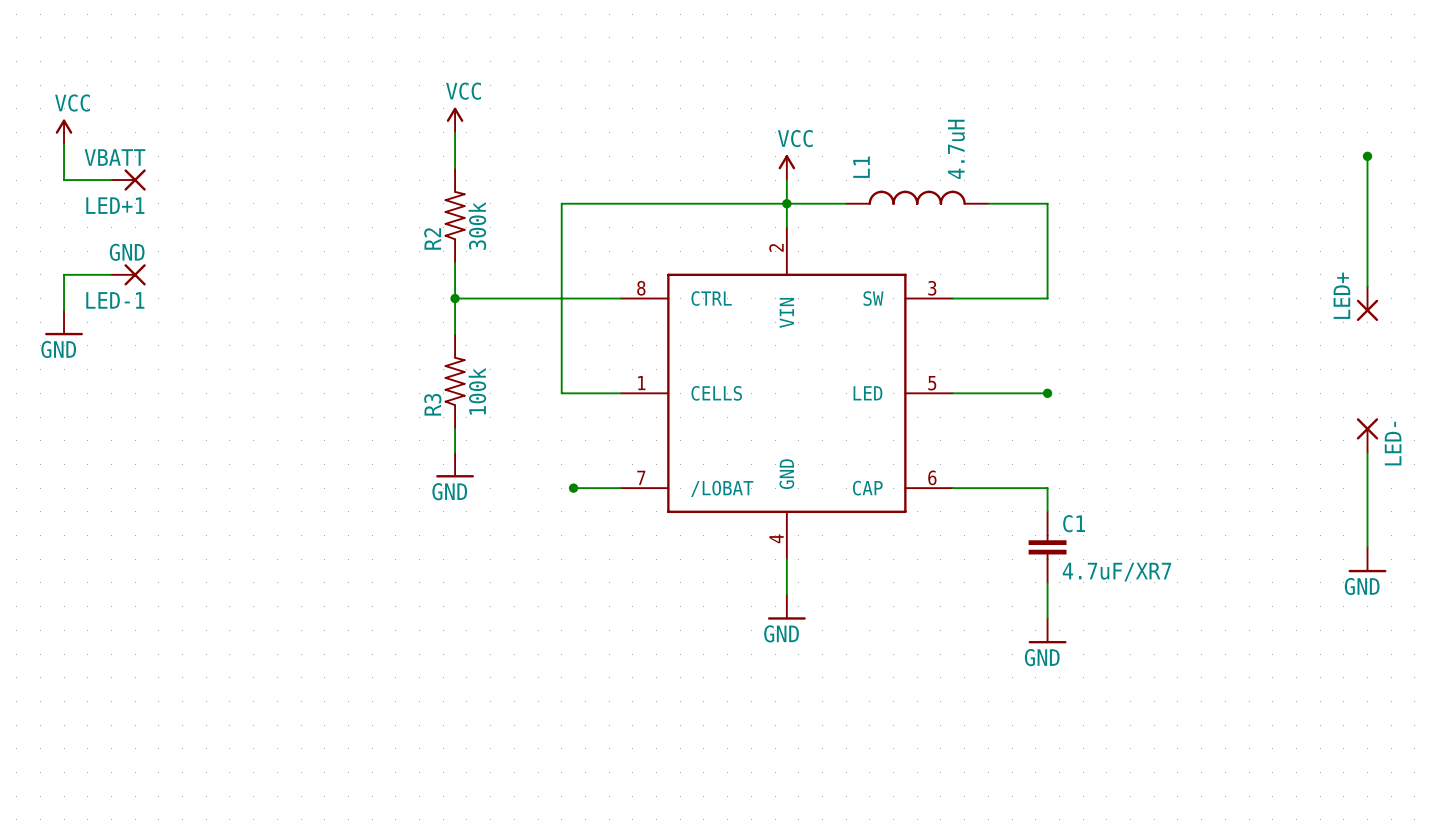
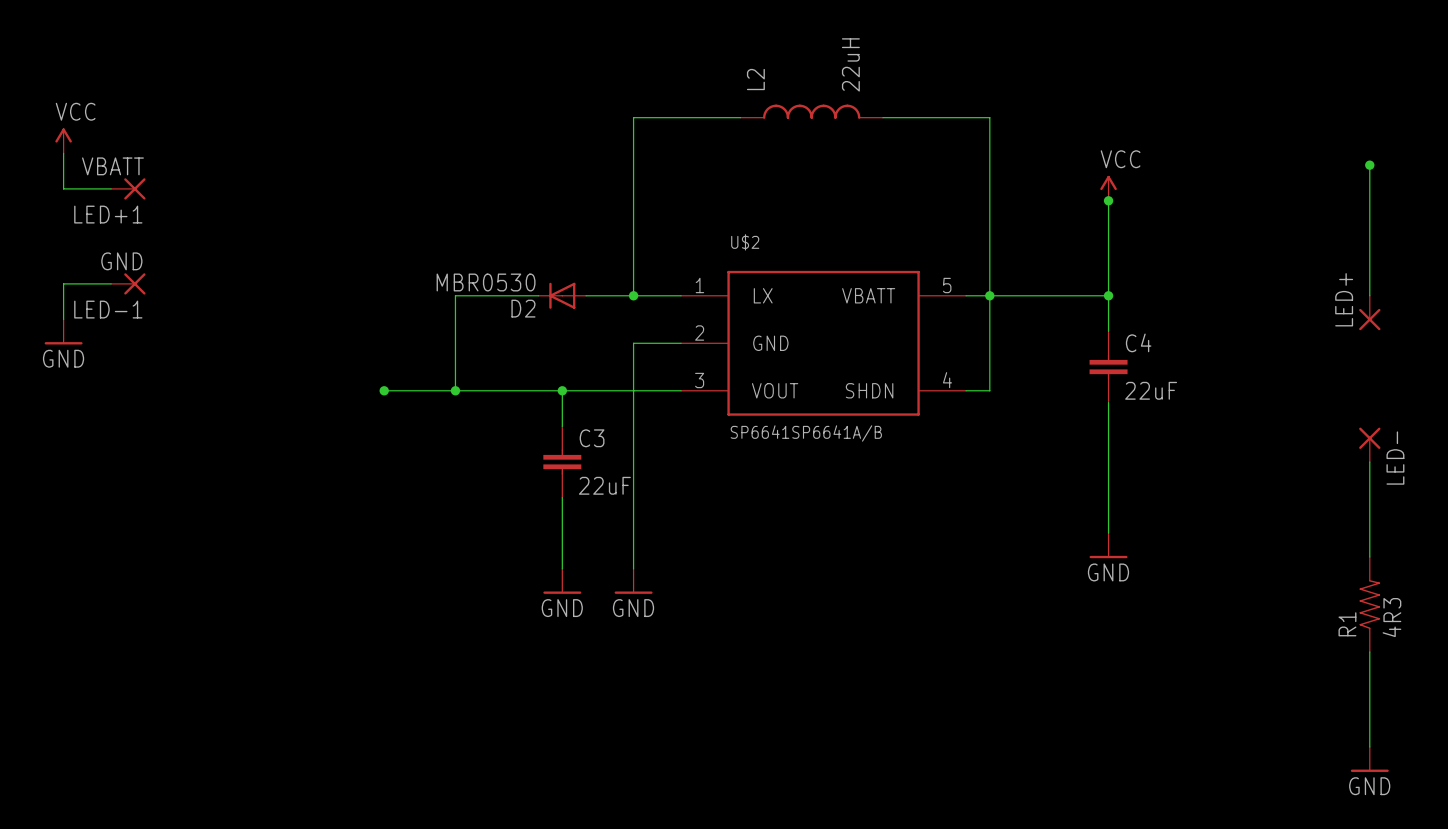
L2: none -> 22uH (811, 111)
wire: none -> (740, 117) (633, 117) (633, 295)
wire: none -> (882, 117) (989, 117) (989, 390) (966, 390)
power symbol: VCC (455, 120) -> none
wire: (455, 132) (455, 168) -> none
power symbol: VCC (786, 167) -> none
power symbol: none -> VCC (1108, 188)
wire: (786, 180) (786, 227) -> none
wire: none -> (1108, 200) (1108, 331)
junction: none -> (1108, 200)
L1: 4.7uH (917, 197) -> none
junction: (786, 203) -> none
wire: (846, 203) (561, 203) (561, 381) -> none
wire: (988, 203) (1047, 203) (1047, 298) (952, 298) -> none
R2: 300k (455, 215) -> none
wire: (455, 262) (455, 286) -> (538, 295) (455, 295)
D2: none -> MBR0530 (562, 295)
wire: none -> (586, 295) (681, 295)
junction: none -> (633, 295)
wire: none -> (966, 295) (1108, 295)
junction: none -> (989, 295)
junction: none -> (1108, 295)
wire: (455, 298) (620, 298) -> none
junction: (455, 298) -> none
wire: none -> (681, 343) (633, 343) (633, 568)
U$2: none -> SP6641SP6641A/B (823, 343)
C4: none -> 22uF (1108, 367)
wire: none -> (384, 390) (681, 390)
junction: none -> (384, 390)
R3: 100k (455, 381) -> none
junction: none -> (455, 390)
junction: none -> (562, 390)
wire: (561, 393) (620, 393) -> (562, 402) (562, 426)
part: (786, 393) -> none
wire: (952, 393) (1047, 393) -> none
junction: (1047, 393) -> none
wire: none -> (1108, 402) (1108, 533)
wire: (455, 428) (455, 452) -> none
C3: none -> 22uF (562, 462)
power symbol: GND (455, 465) -> none
wire: none -> (562, 497) (562, 568)
wire: (573, 488) (620, 488) -> none
junction: (573, 488) -> none
wire: (952, 488) (1047, 488) (1047, 511) -> none
C1: 4.7uF/XR7 (1047, 547) -> none
wire: (786, 559) (786, 594) -> none
power symbol: GND (1367, 559) -> none
power symbol: none -> GND (562, 581)
power symbol: none -> GND (633, 581)
wire: (1047, 582) (1047, 618) -> none
R1: none -> 4R3 (1369, 604)
power symbol: GND (786, 607) -> none
power symbol position: GND (1047, 630) -> GND (1108, 545)
wire: none -> (1369, 652) (1369, 747)
power symbol: none -> GND (1369, 759)

